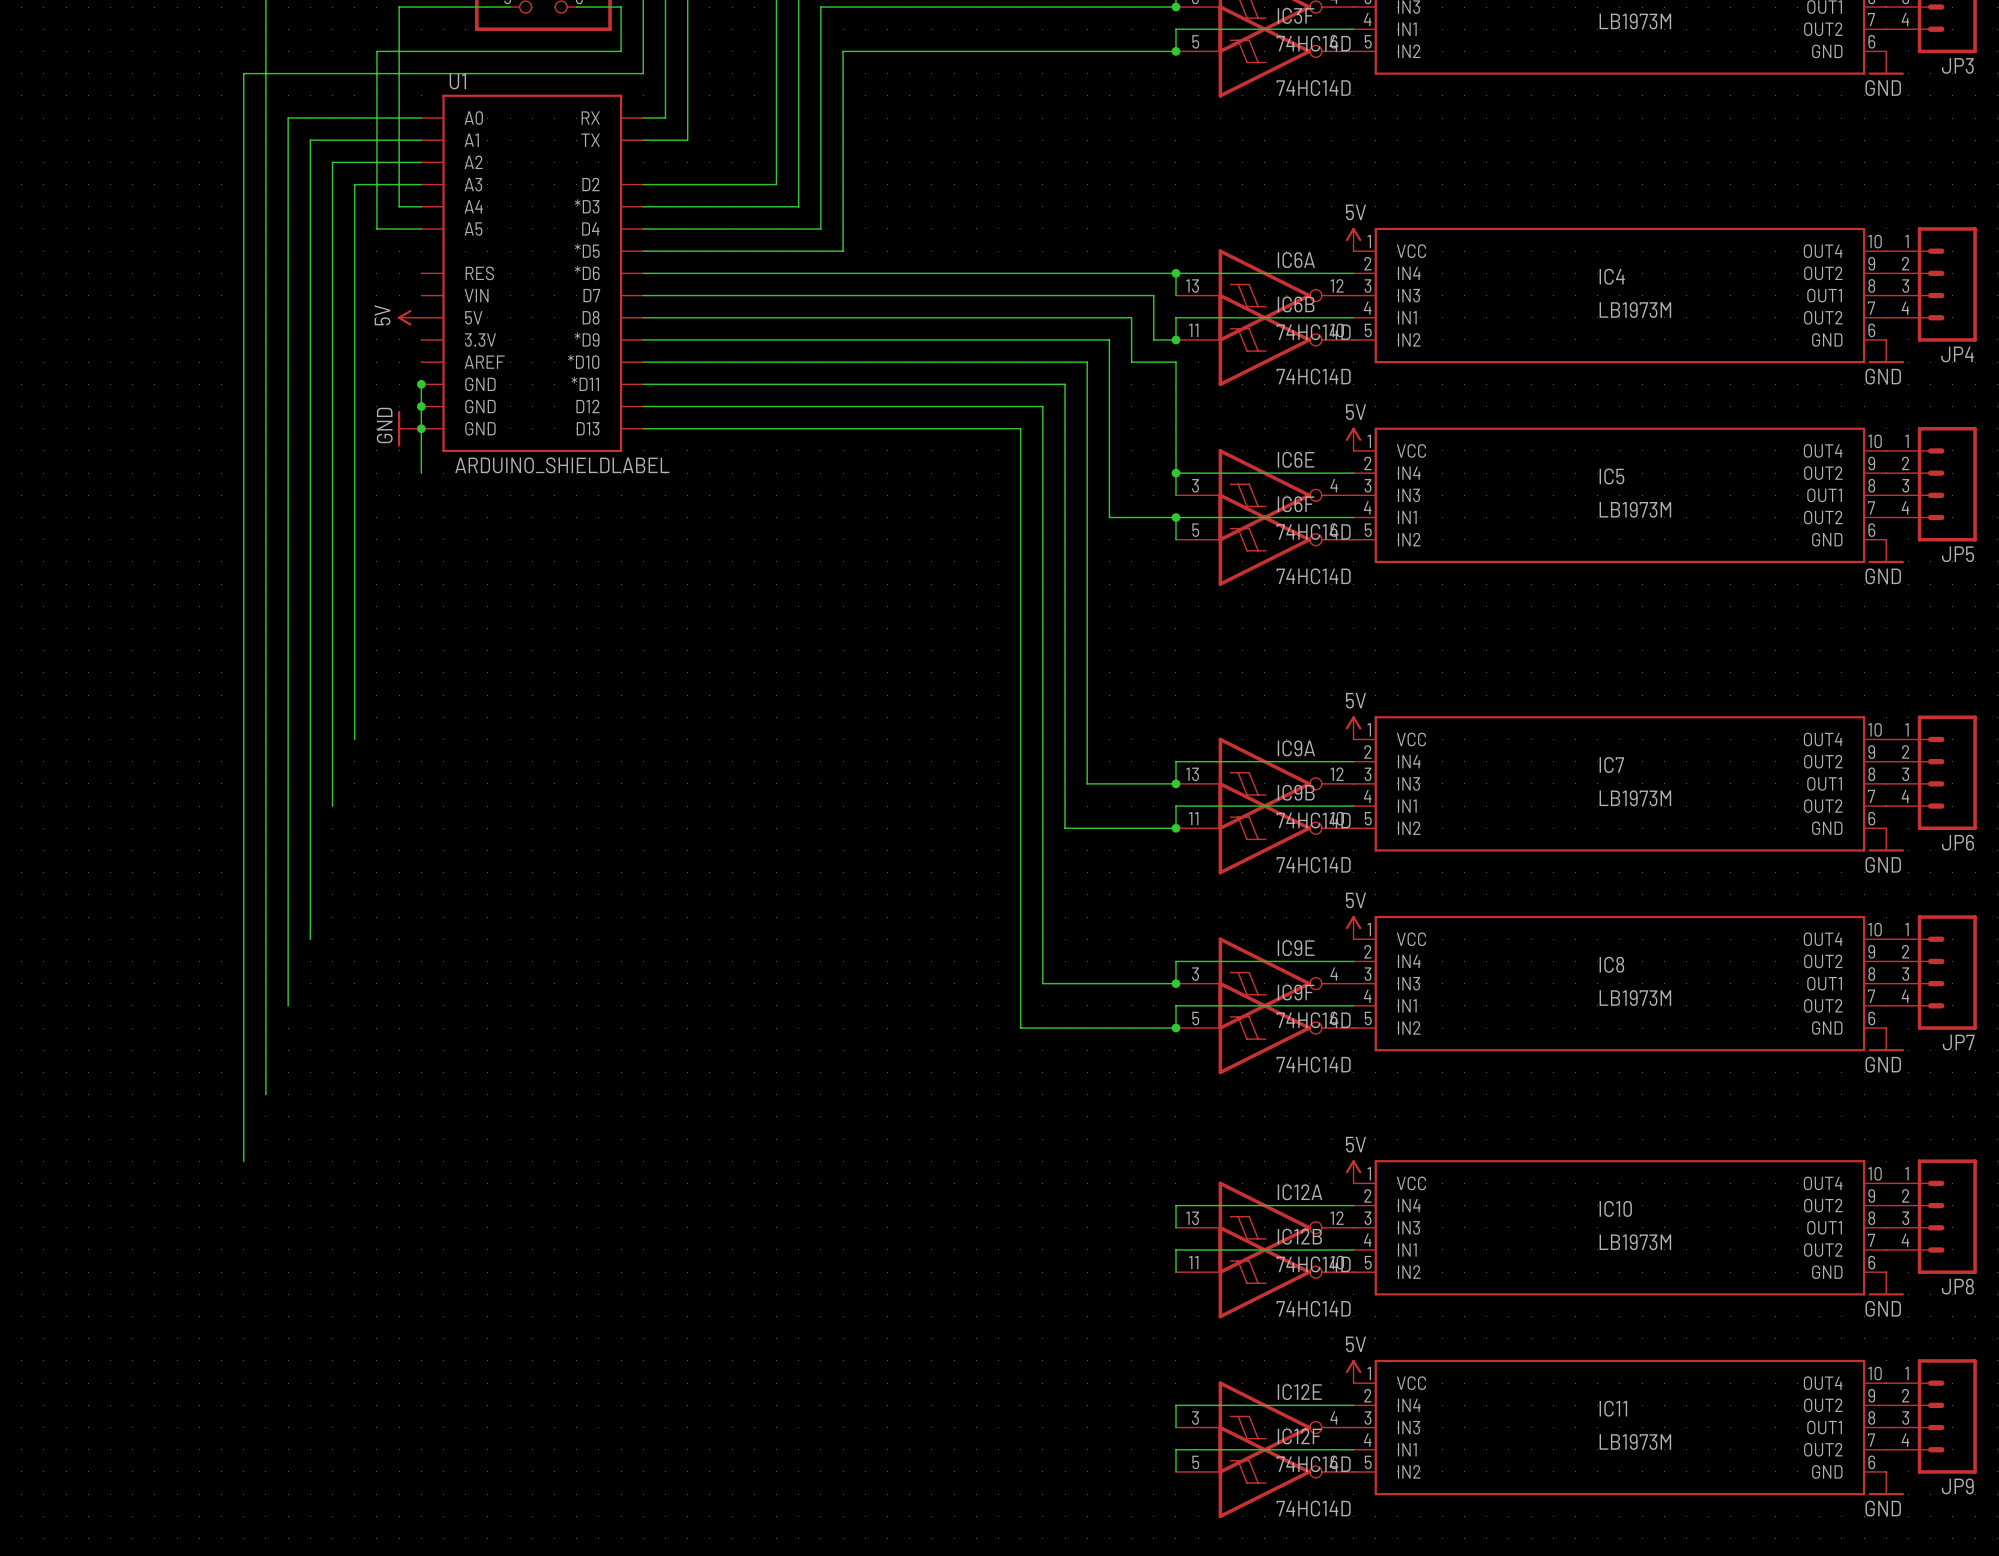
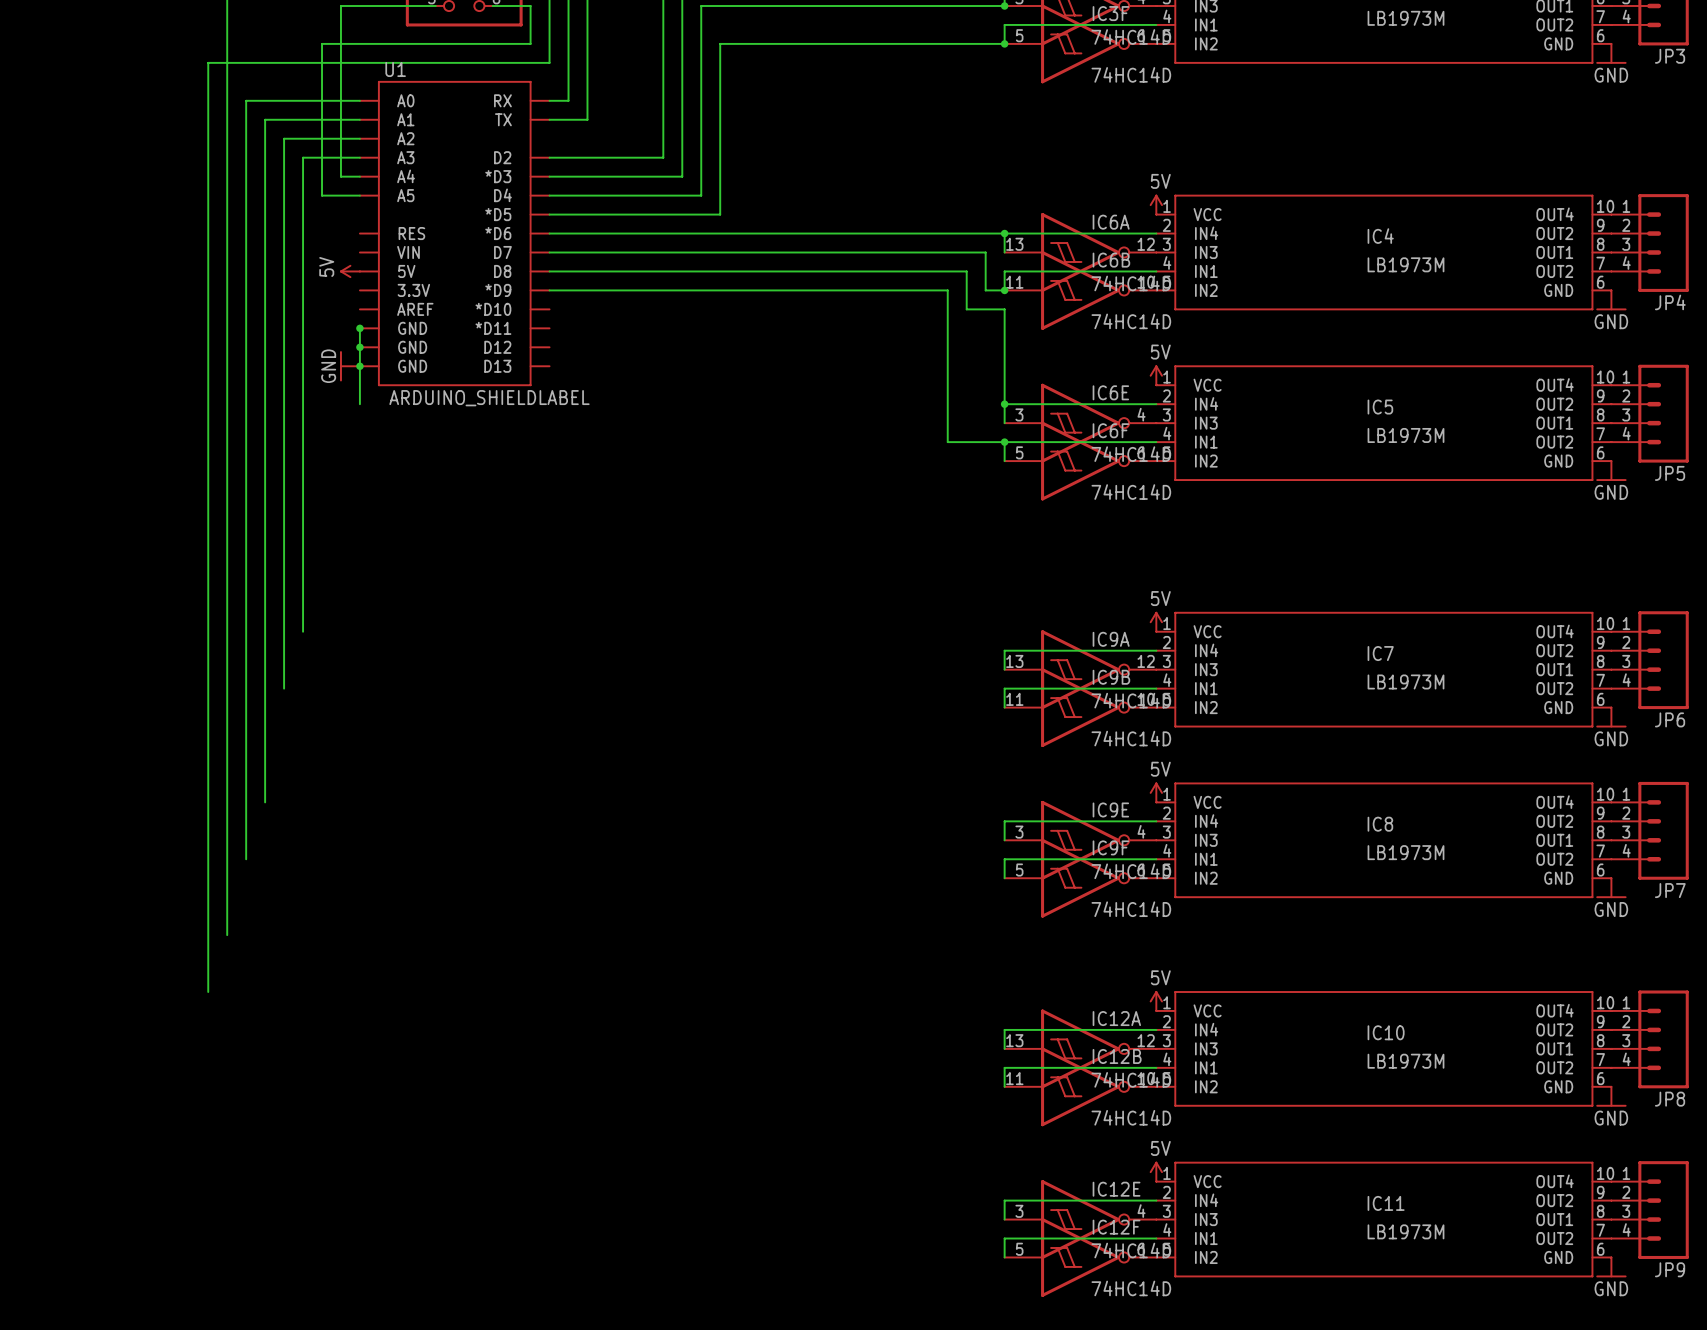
wire: (643, 362) (1087, 362) (1087, 783) (1175, 783) -> none
wire: (643, 384) (1065, 384) (1065, 828) (1175, 828) -> none
wire: (643, 406) (1042, 406) (1042, 983) (1175, 983) -> none
wire: (643, 428) (1020, 428) (1020, 1028) (1175, 1028) -> none
junction: (1175, 783) -> none
junction: (1175, 828) -> none
junction: (1175, 983) -> none
junction: (1175, 1028) -> none

